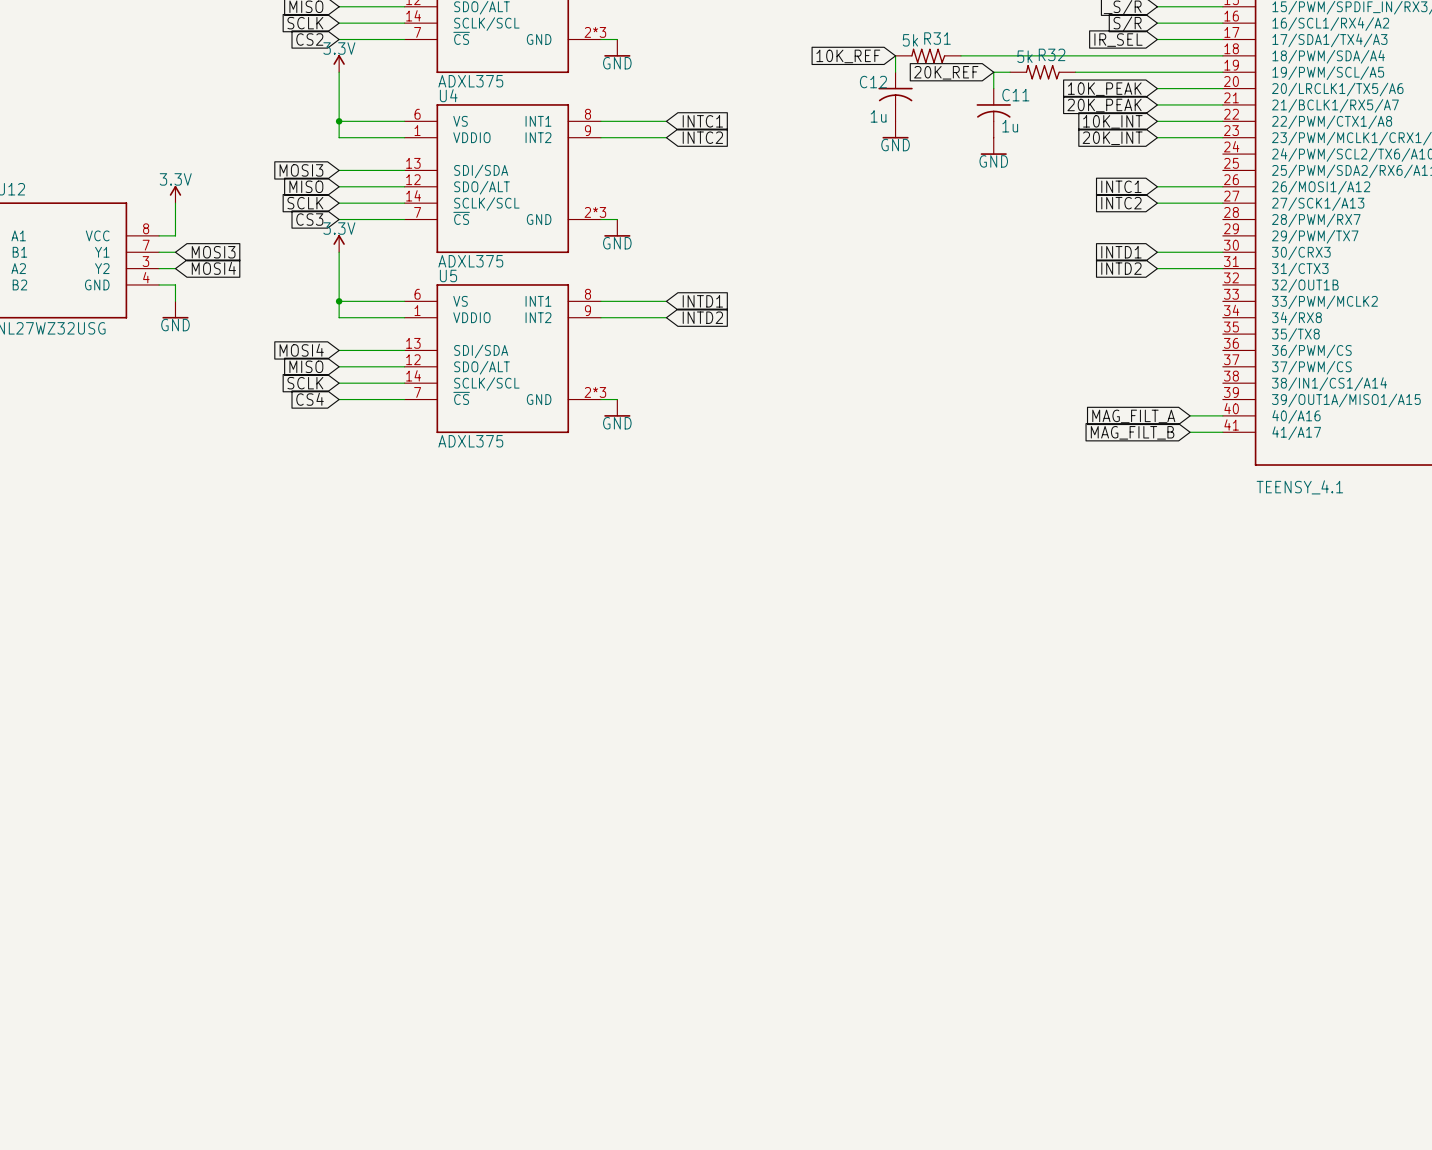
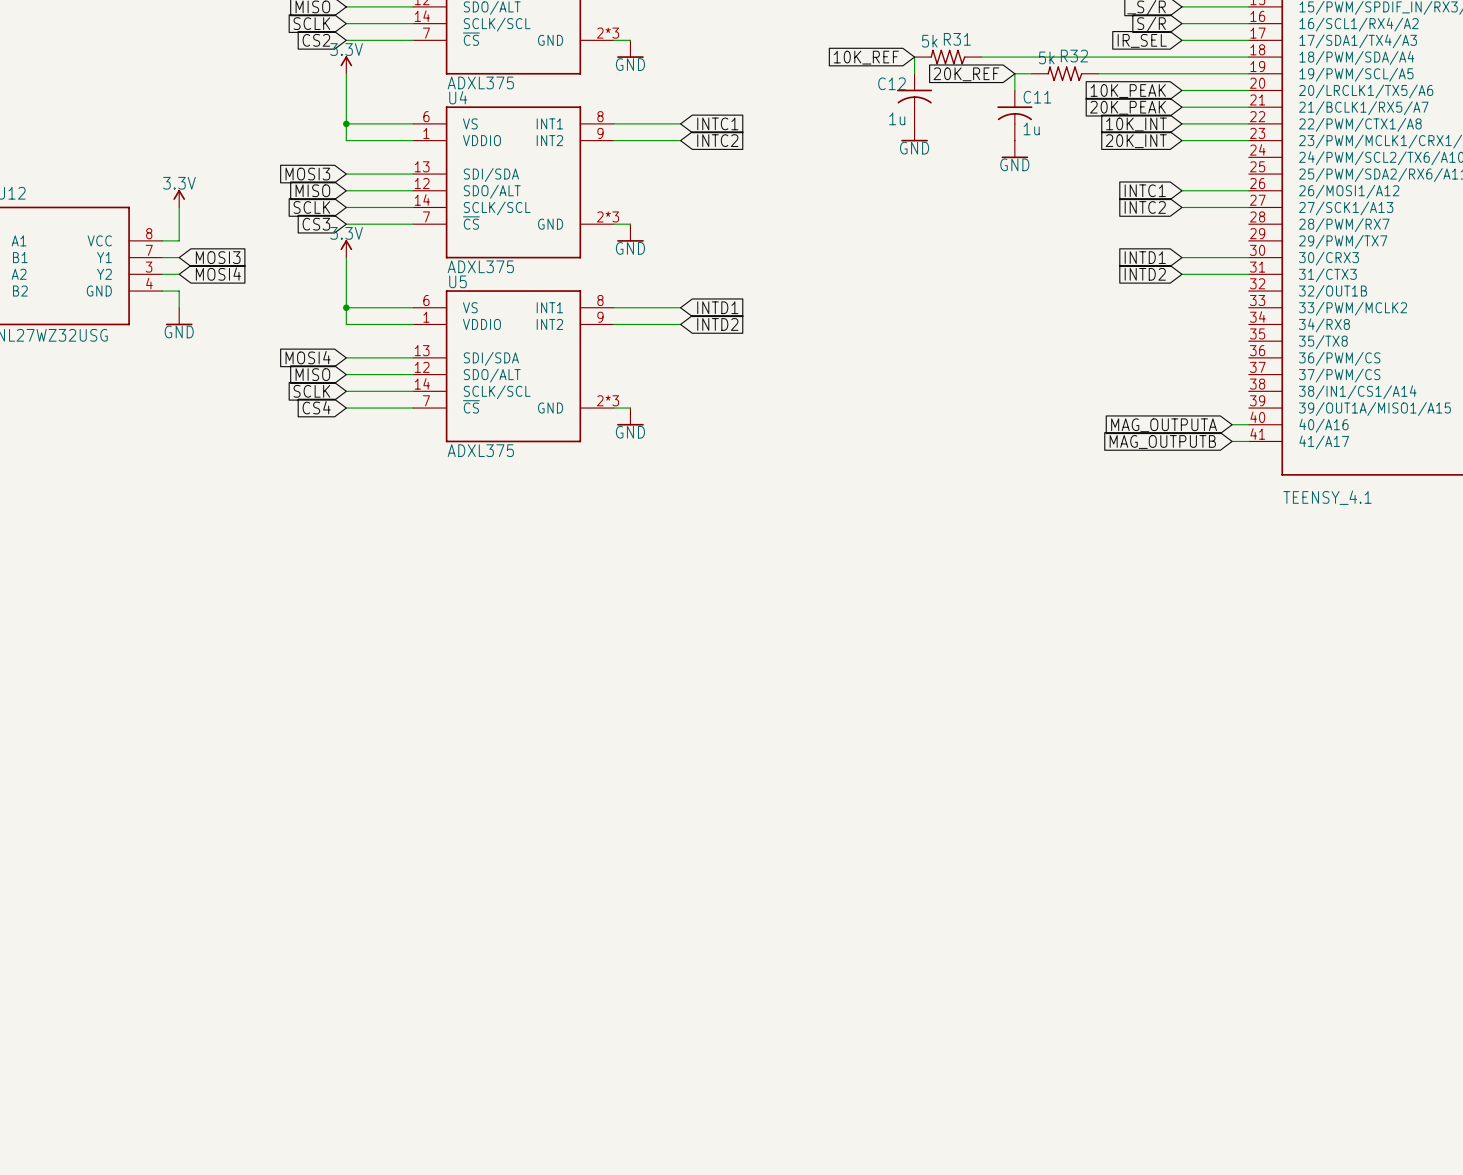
wire: (1190, 415) (1206, 415) -> none
global label: MAG_FILT_A (1133, 416) -> none
global label: none -> MAG_OUTPUTA (1164, 425)
global label: MAG_FILT_B (1132, 432) -> none
global label: none -> MAG_OUTPUTB (1162, 442)
wire: (1190, 432) (1206, 432) -> none

